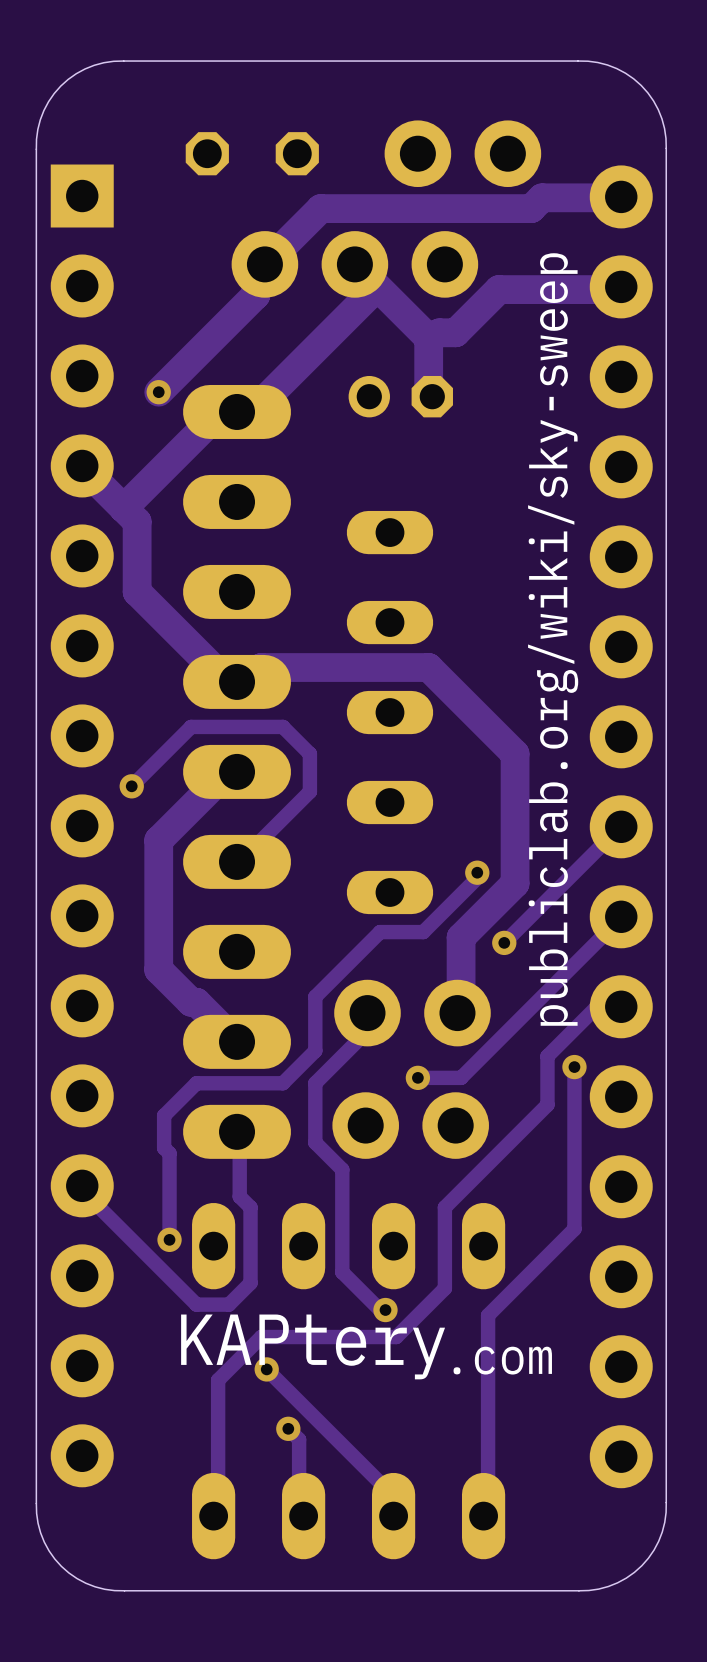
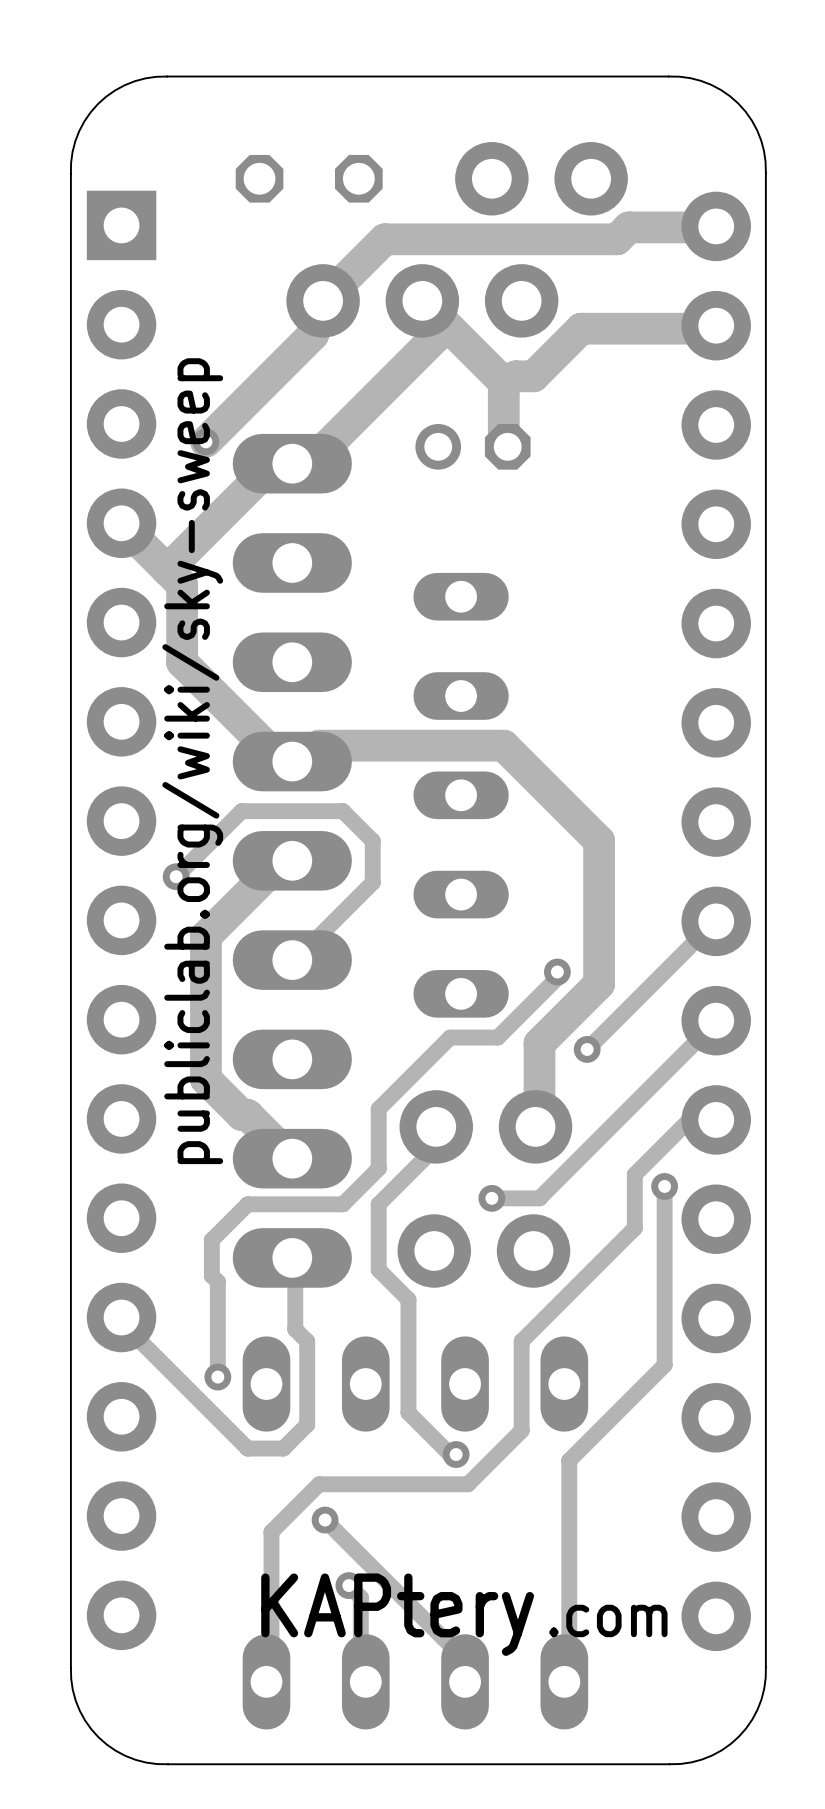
text position: publiclab.org/wiki/sky-sweep (553, 639) -> publiclab.org/wiki/sky-sweep (192, 761)
text position: KAPtery (313, 1346) -> KAPtery (397, 1614)
text position: .com (502, 1360) -> .com (608, 1620)

